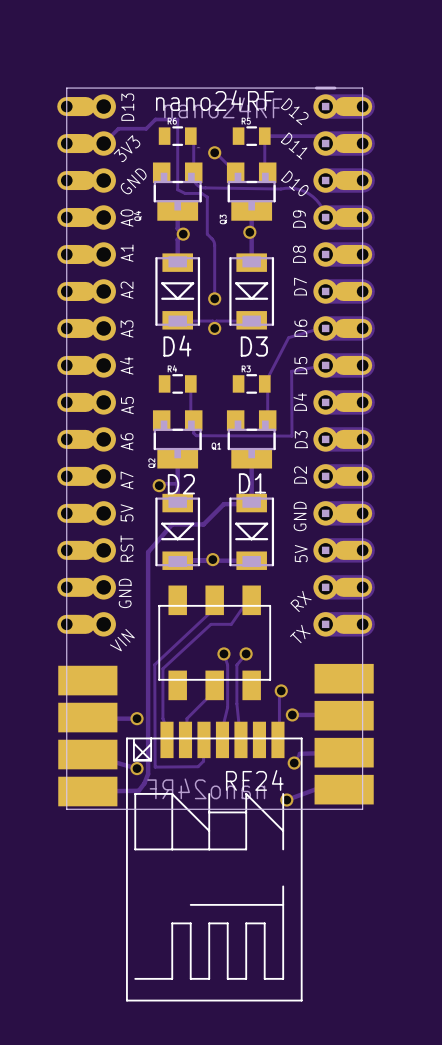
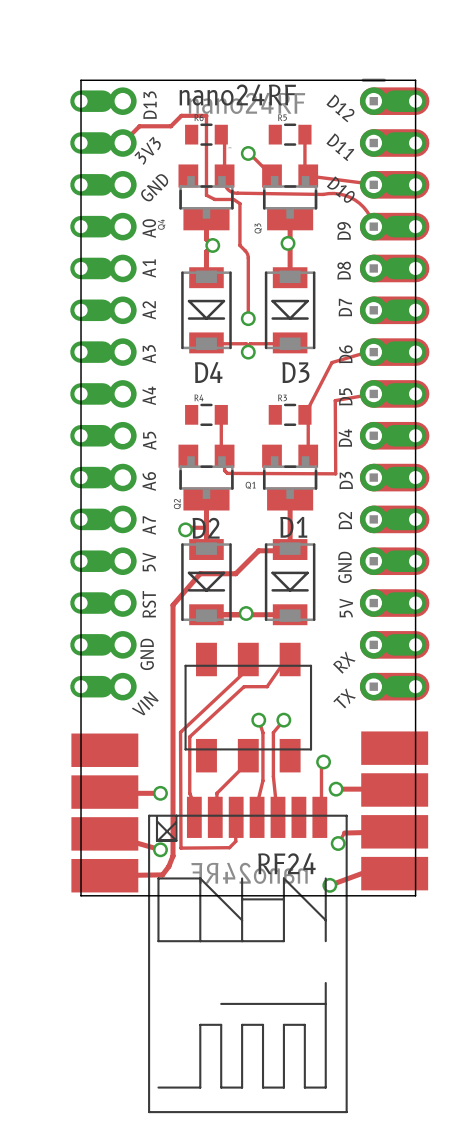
track: (264, 136) (319, 136) (324, 139) (325, 143) -> none
track: none -> (308, 175) (373, 184)

